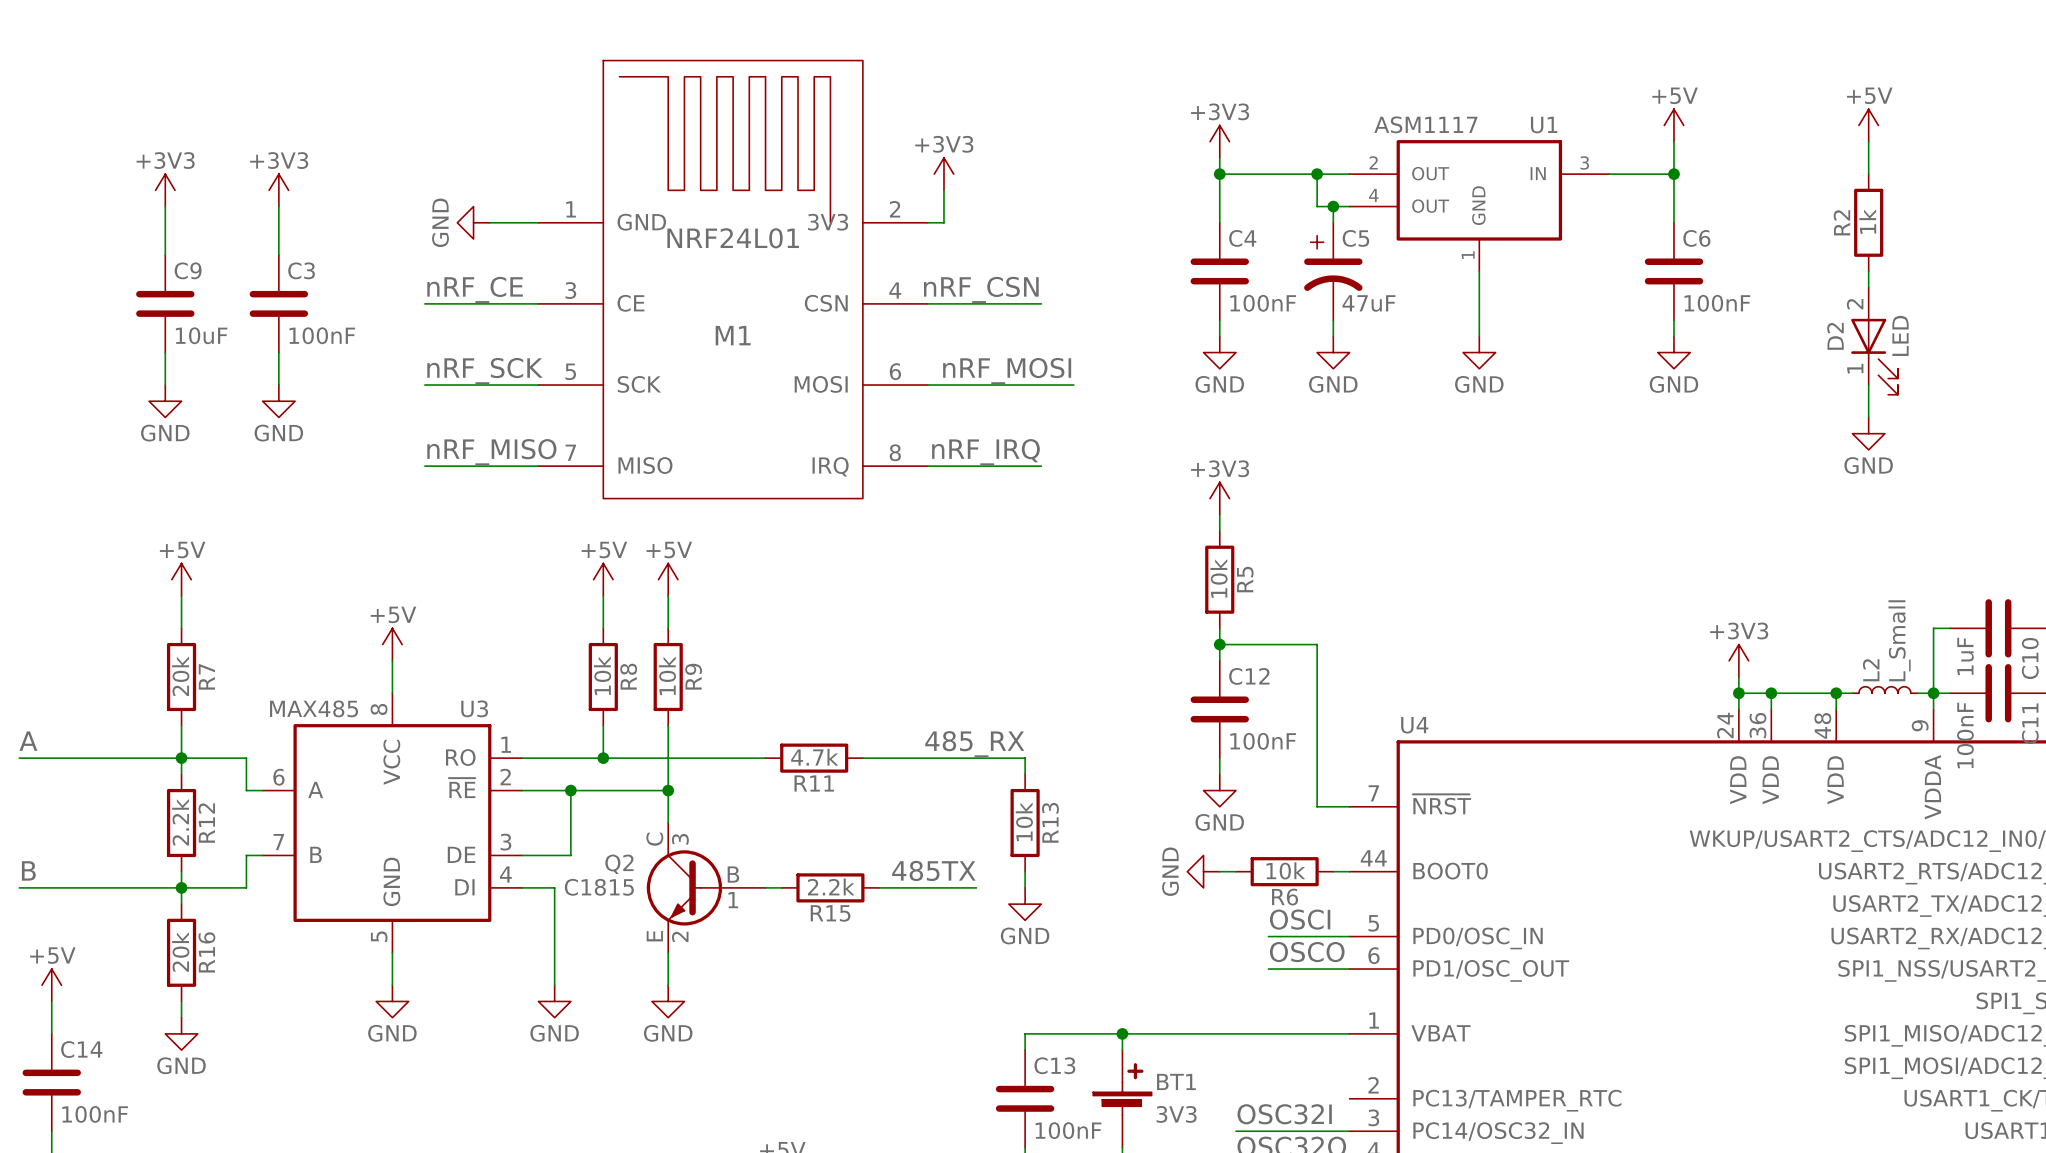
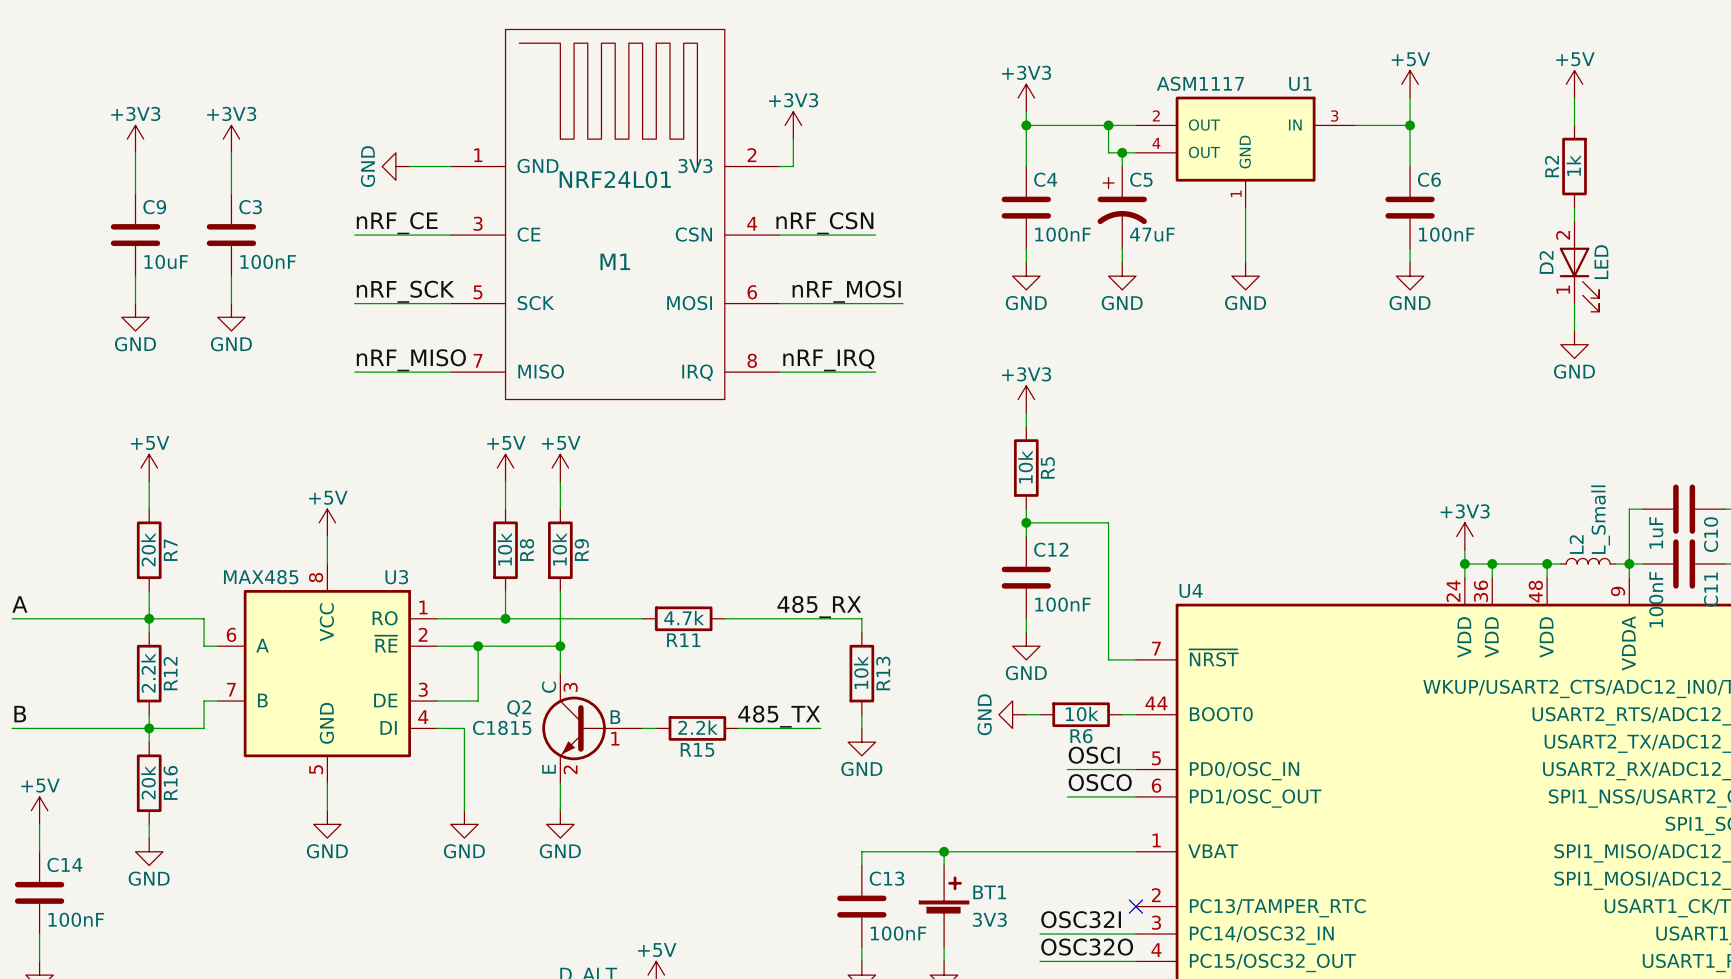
label: 485TX (933, 870) -> 485_TX (779, 716)
no-connect mark: none -> (1135, 906)

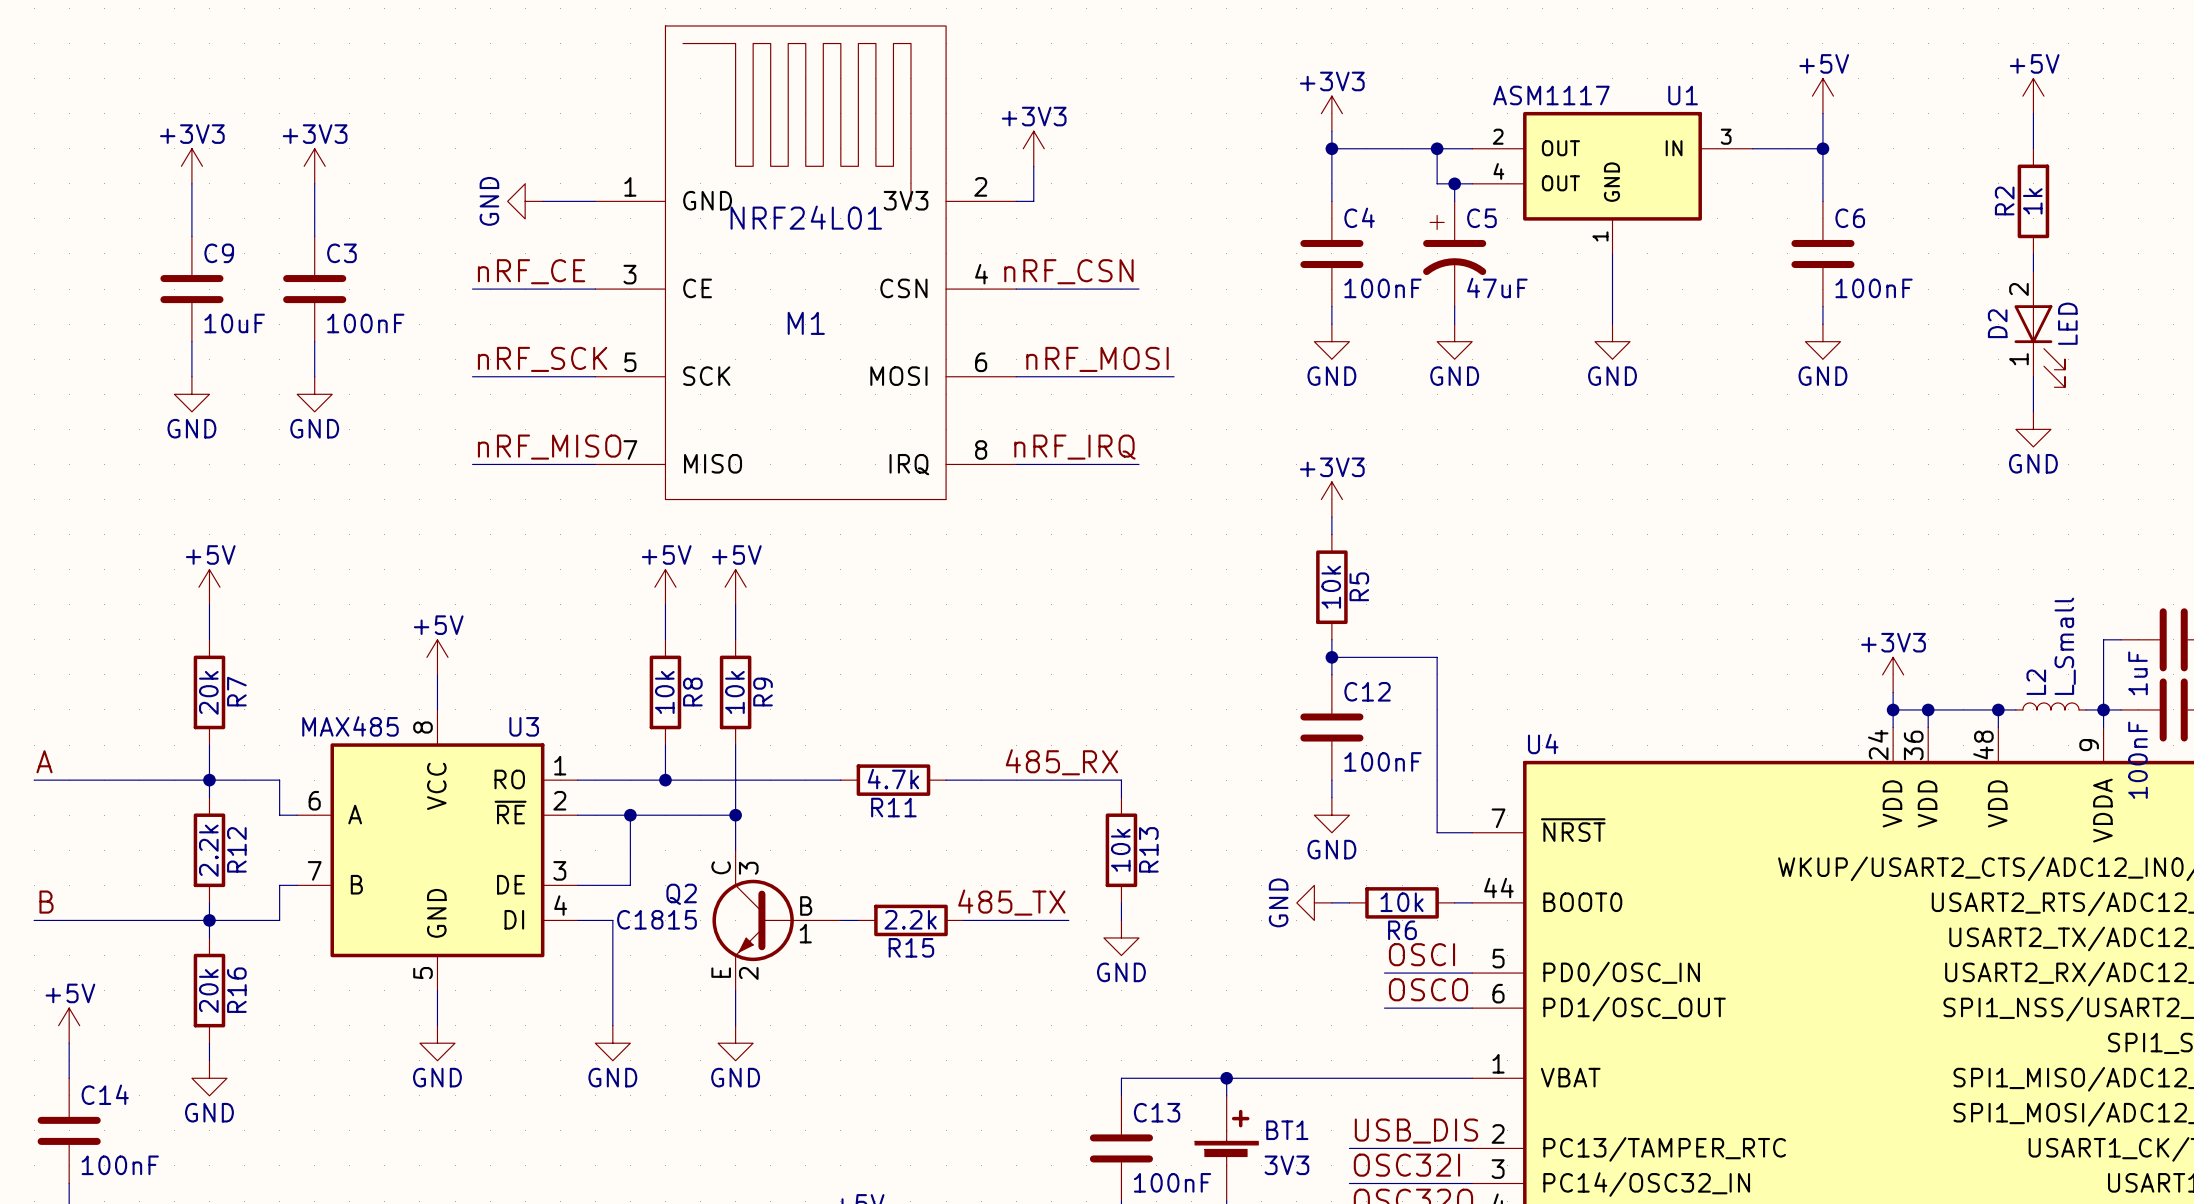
label: none -> USB_DIS (1416, 1131)
wire: none -> (1349, 1148) (1472, 1148)
no-connect mark: (1135, 906) -> none

